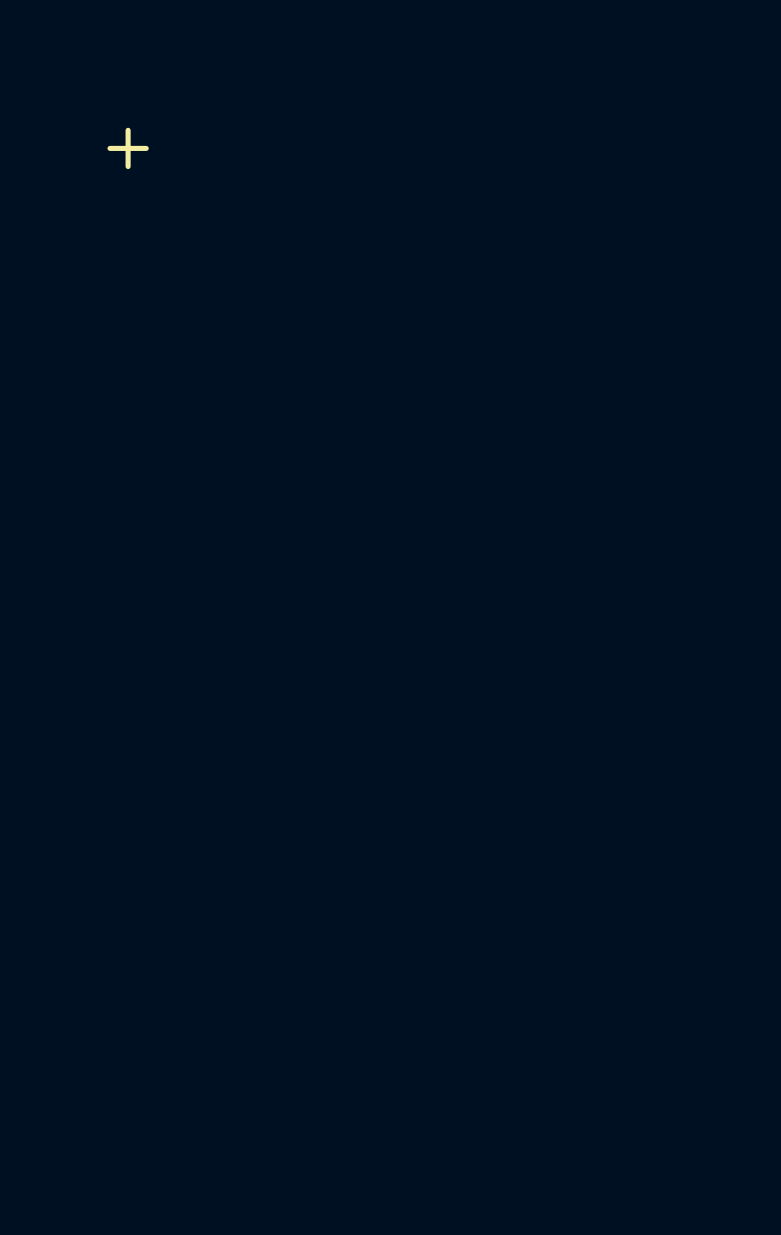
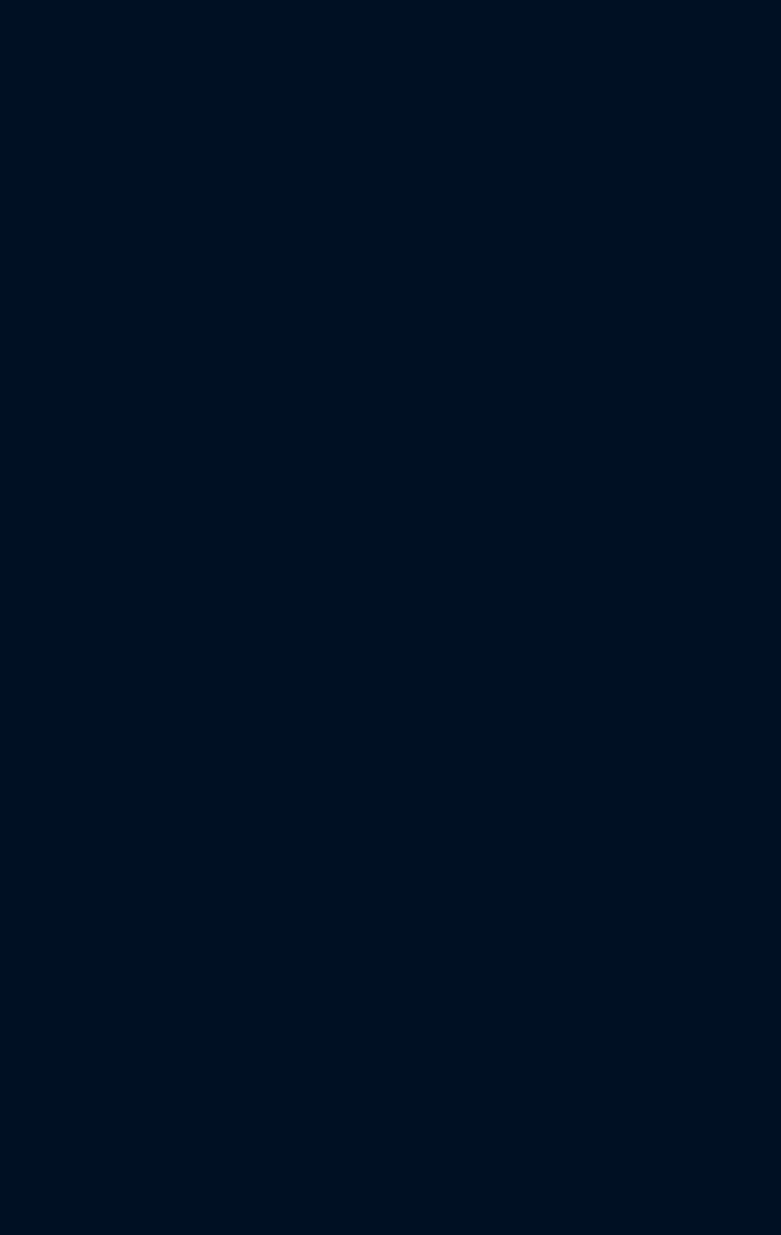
text: + (128, 148) -> none

